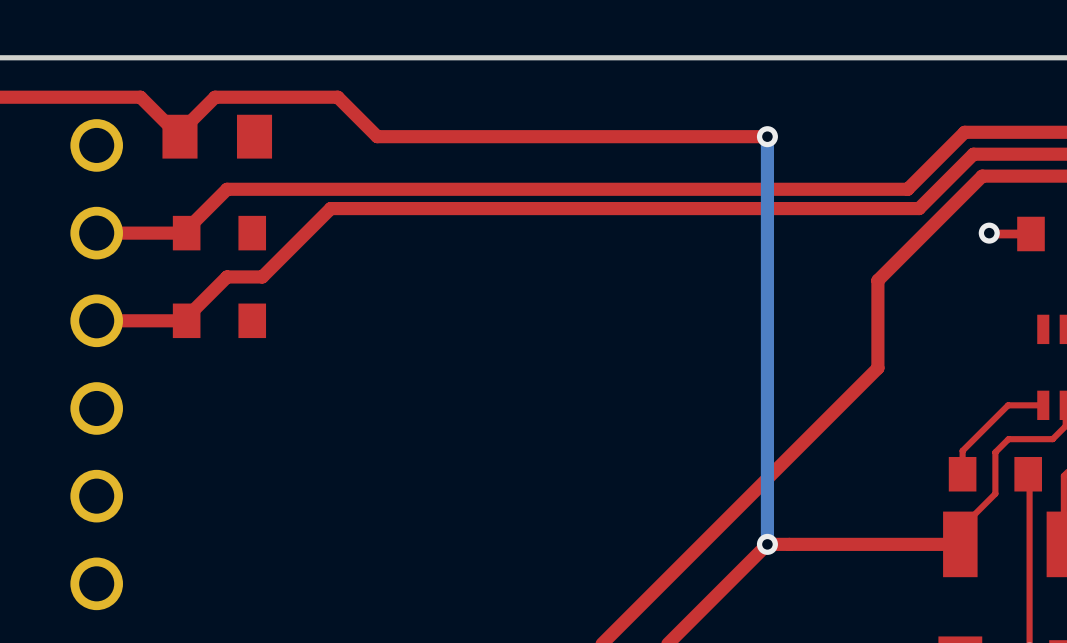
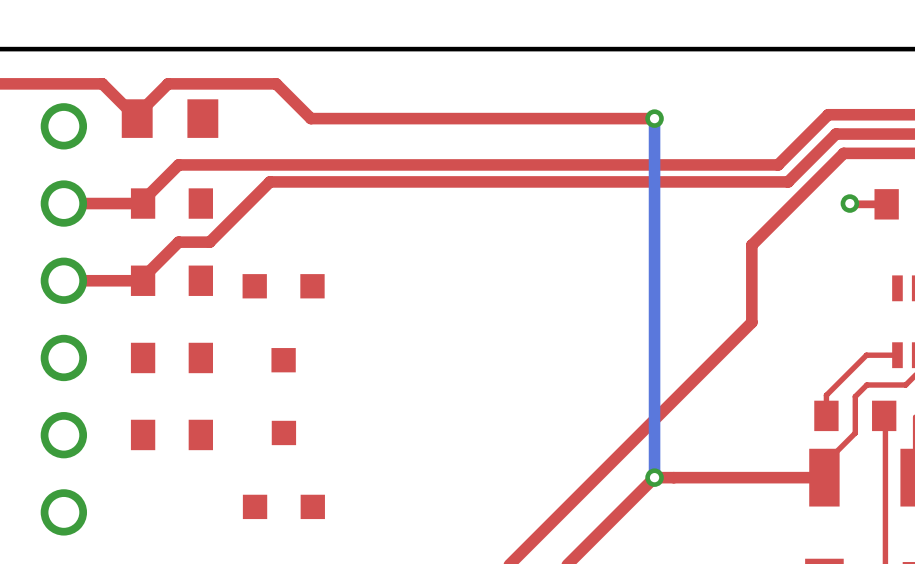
part: none -> (283, 323)
part: none -> (171, 357)
part: none -> (171, 434)
part: none -> (283, 469)

